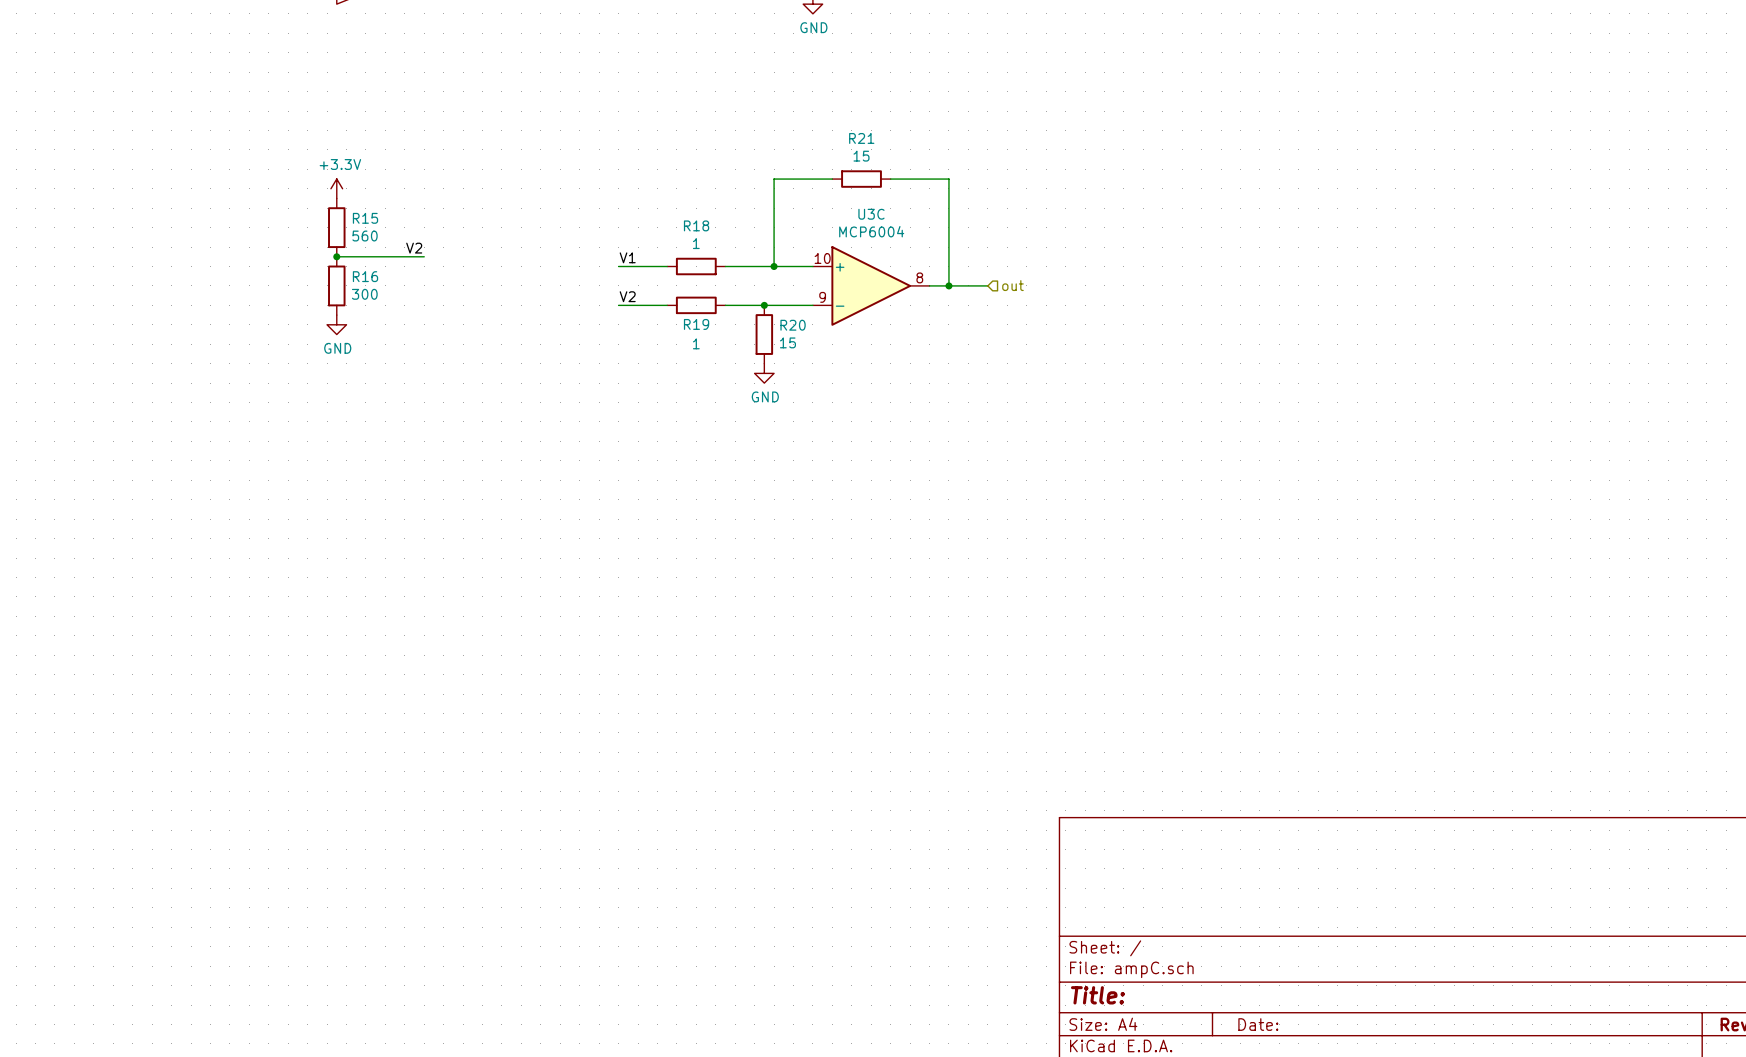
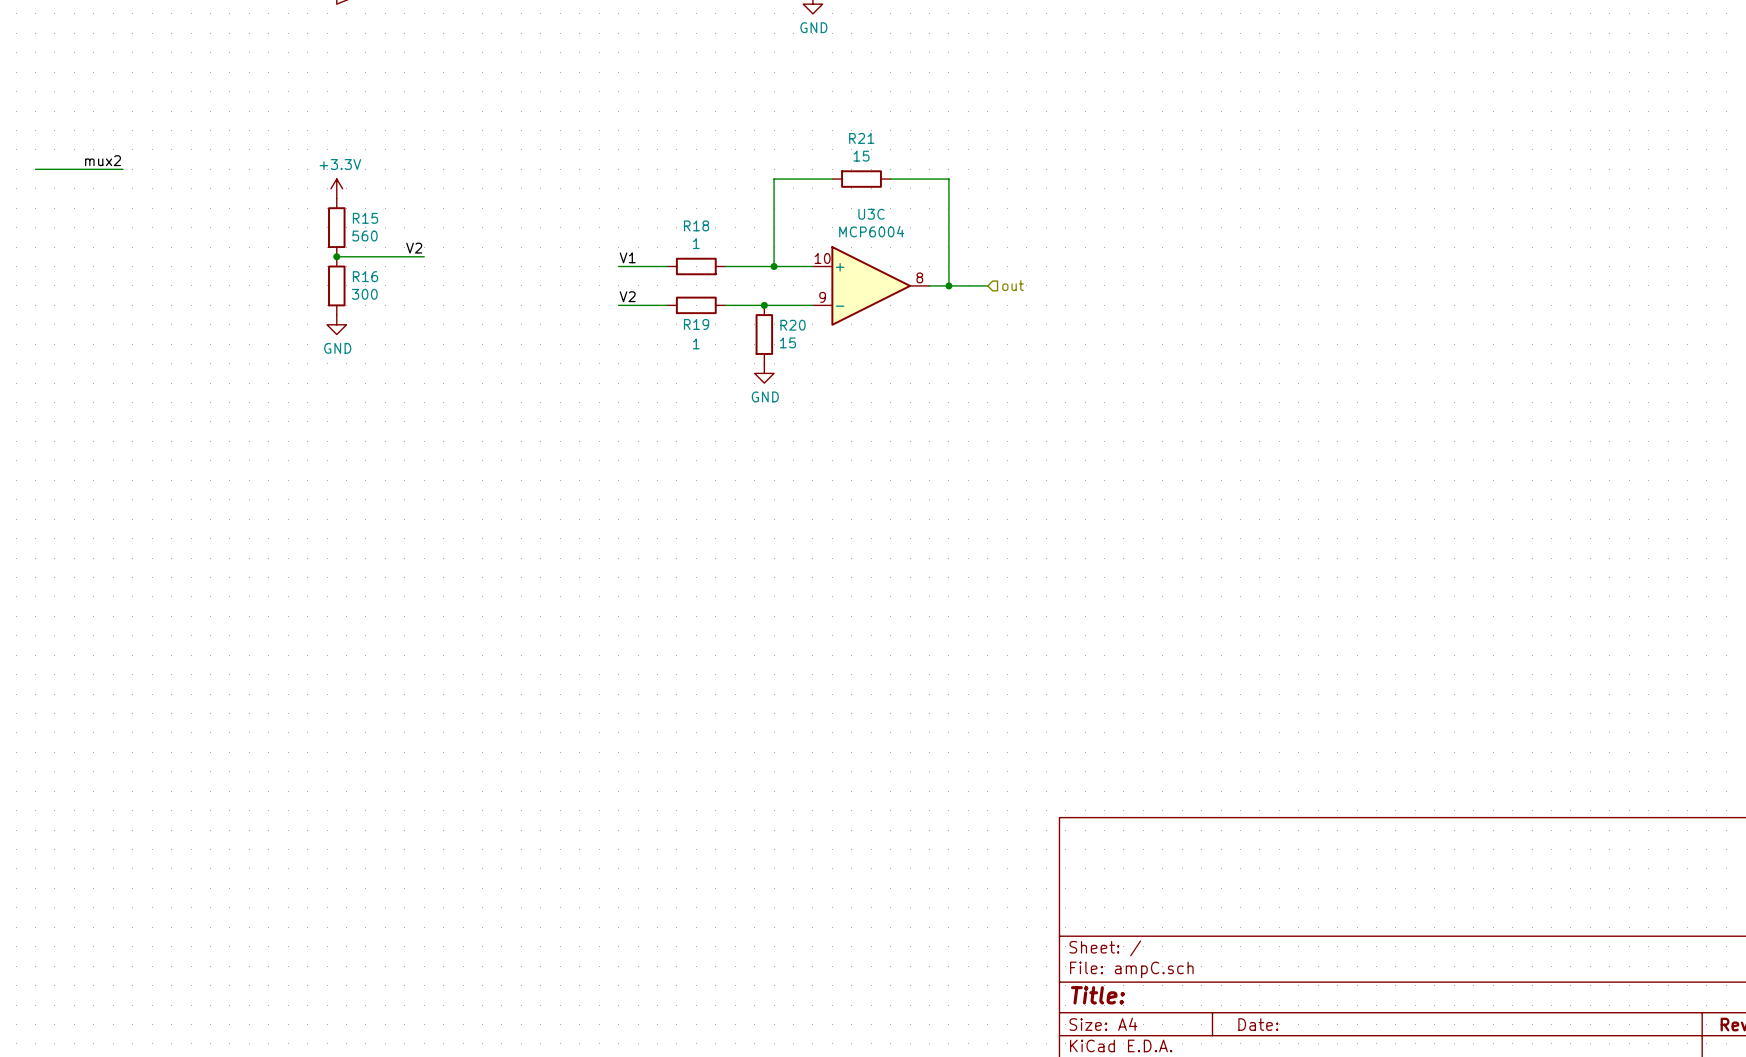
label: none -> mux2 (103, 160)
wire: none -> (35, 169) (123, 169)

